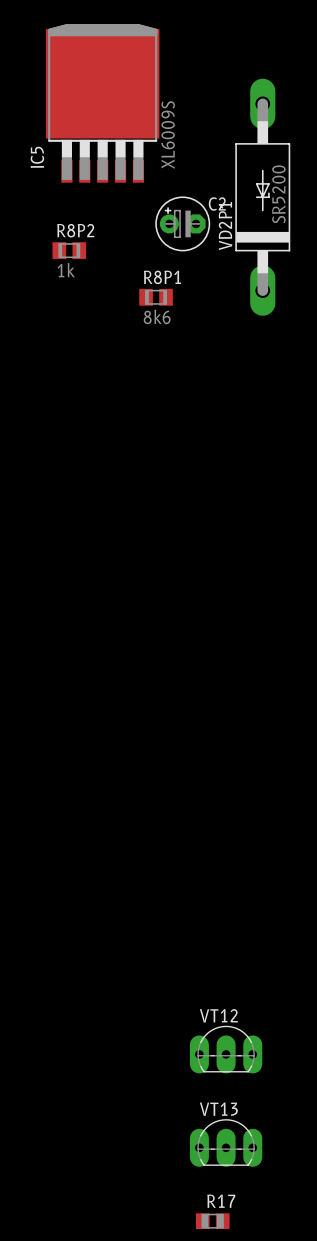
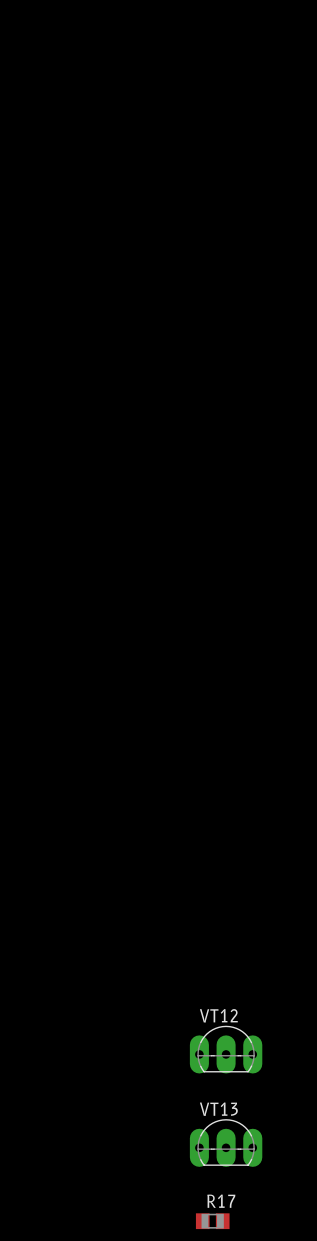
IC5: XL6009S (102, 103) -> none
VD2P1: SR5200 (262, 197) -> none
C2: (182, 223) -> none
R8P2: 1k (69, 250) -> none
R8P1: 8k6 (156, 297) -> none

